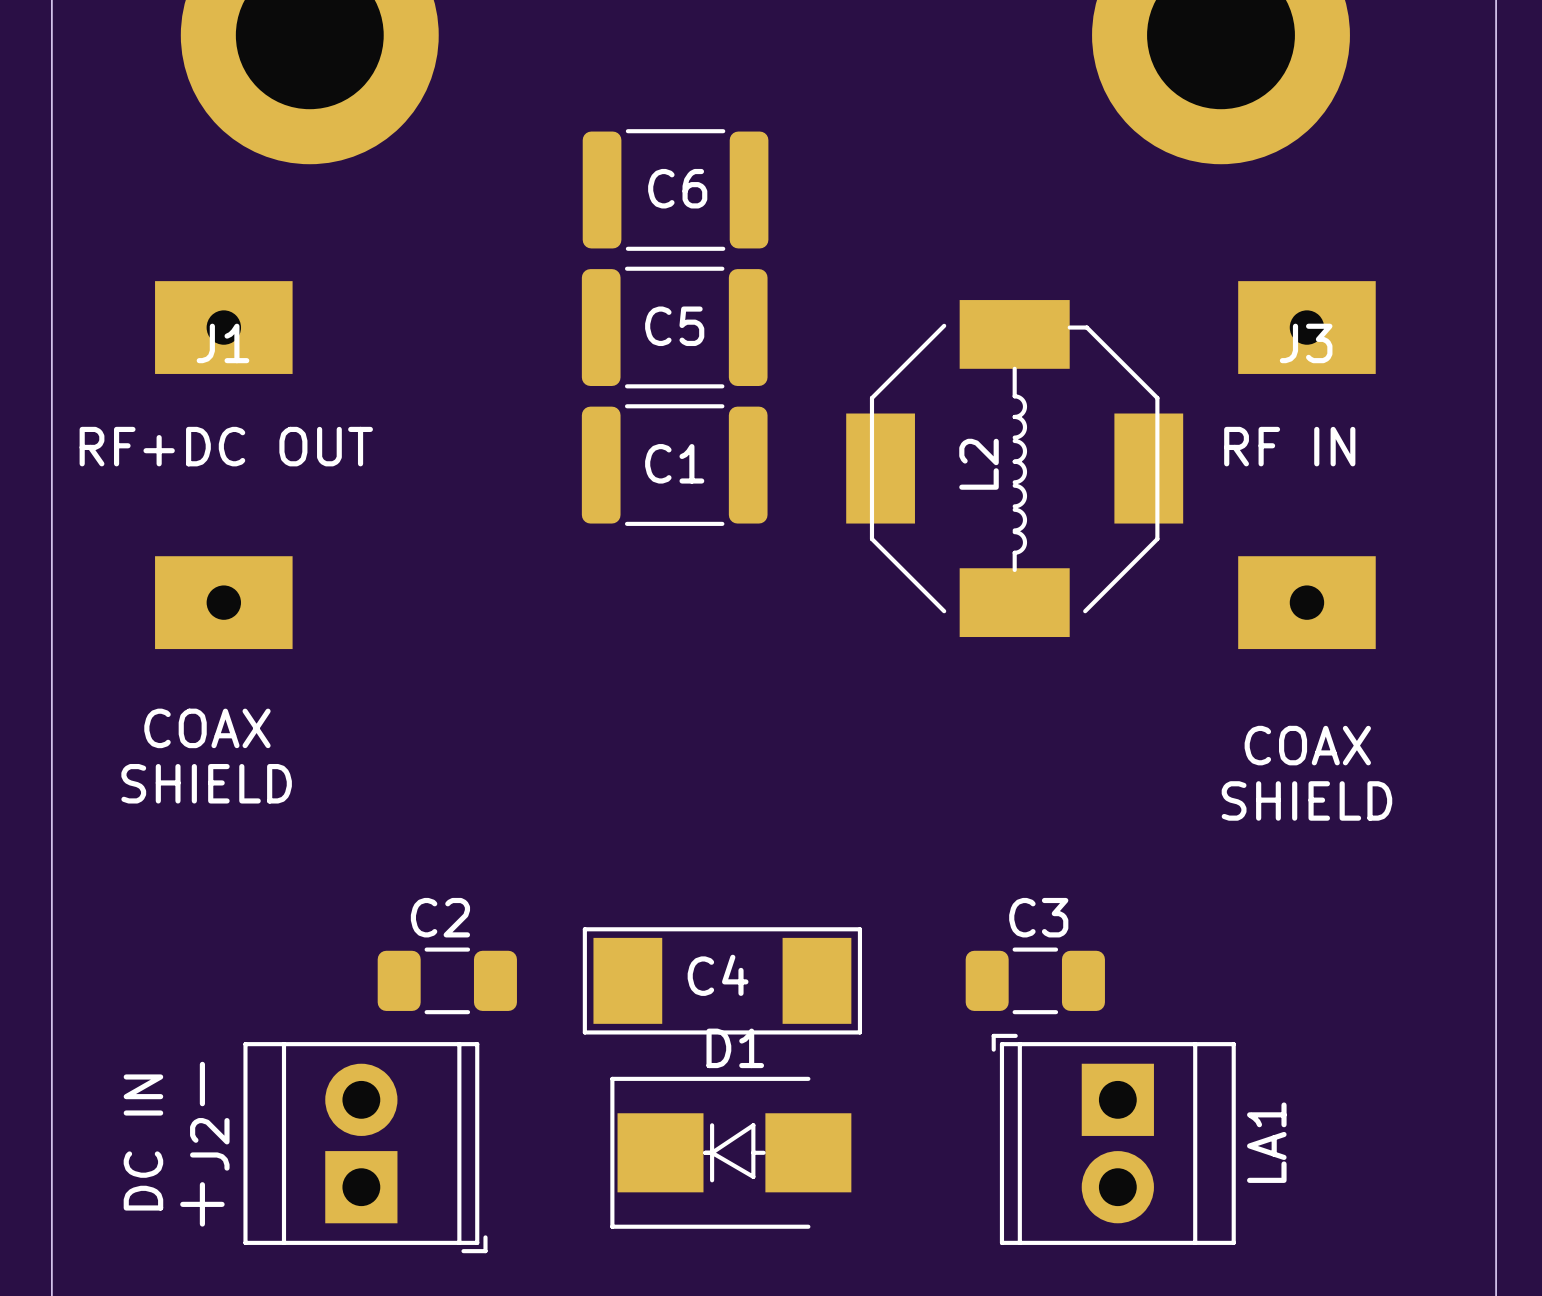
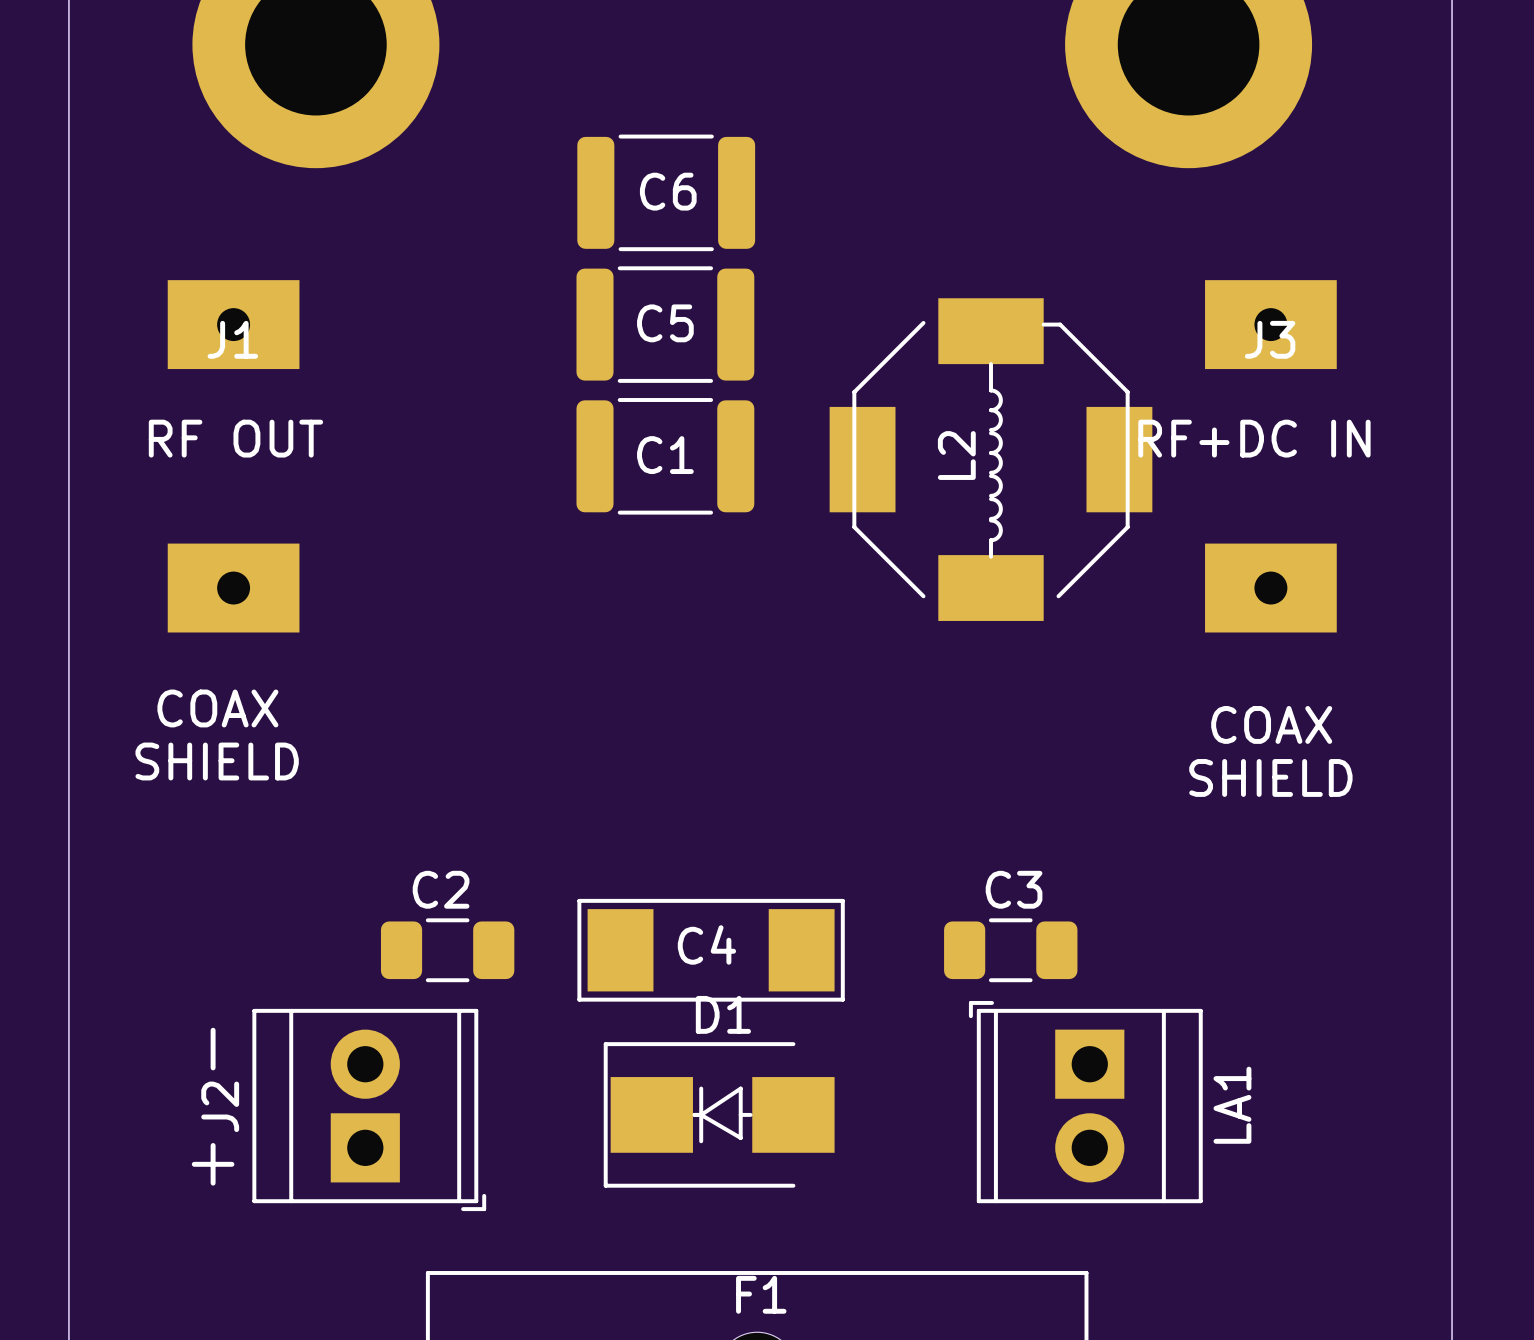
text: RF+DC OUT (226, 446) -> RF OUT (235, 438)
text: RF IN (1289, 446) -> RF+DC IN (1254, 438)
text: DC IN (143, 1142) -> none

